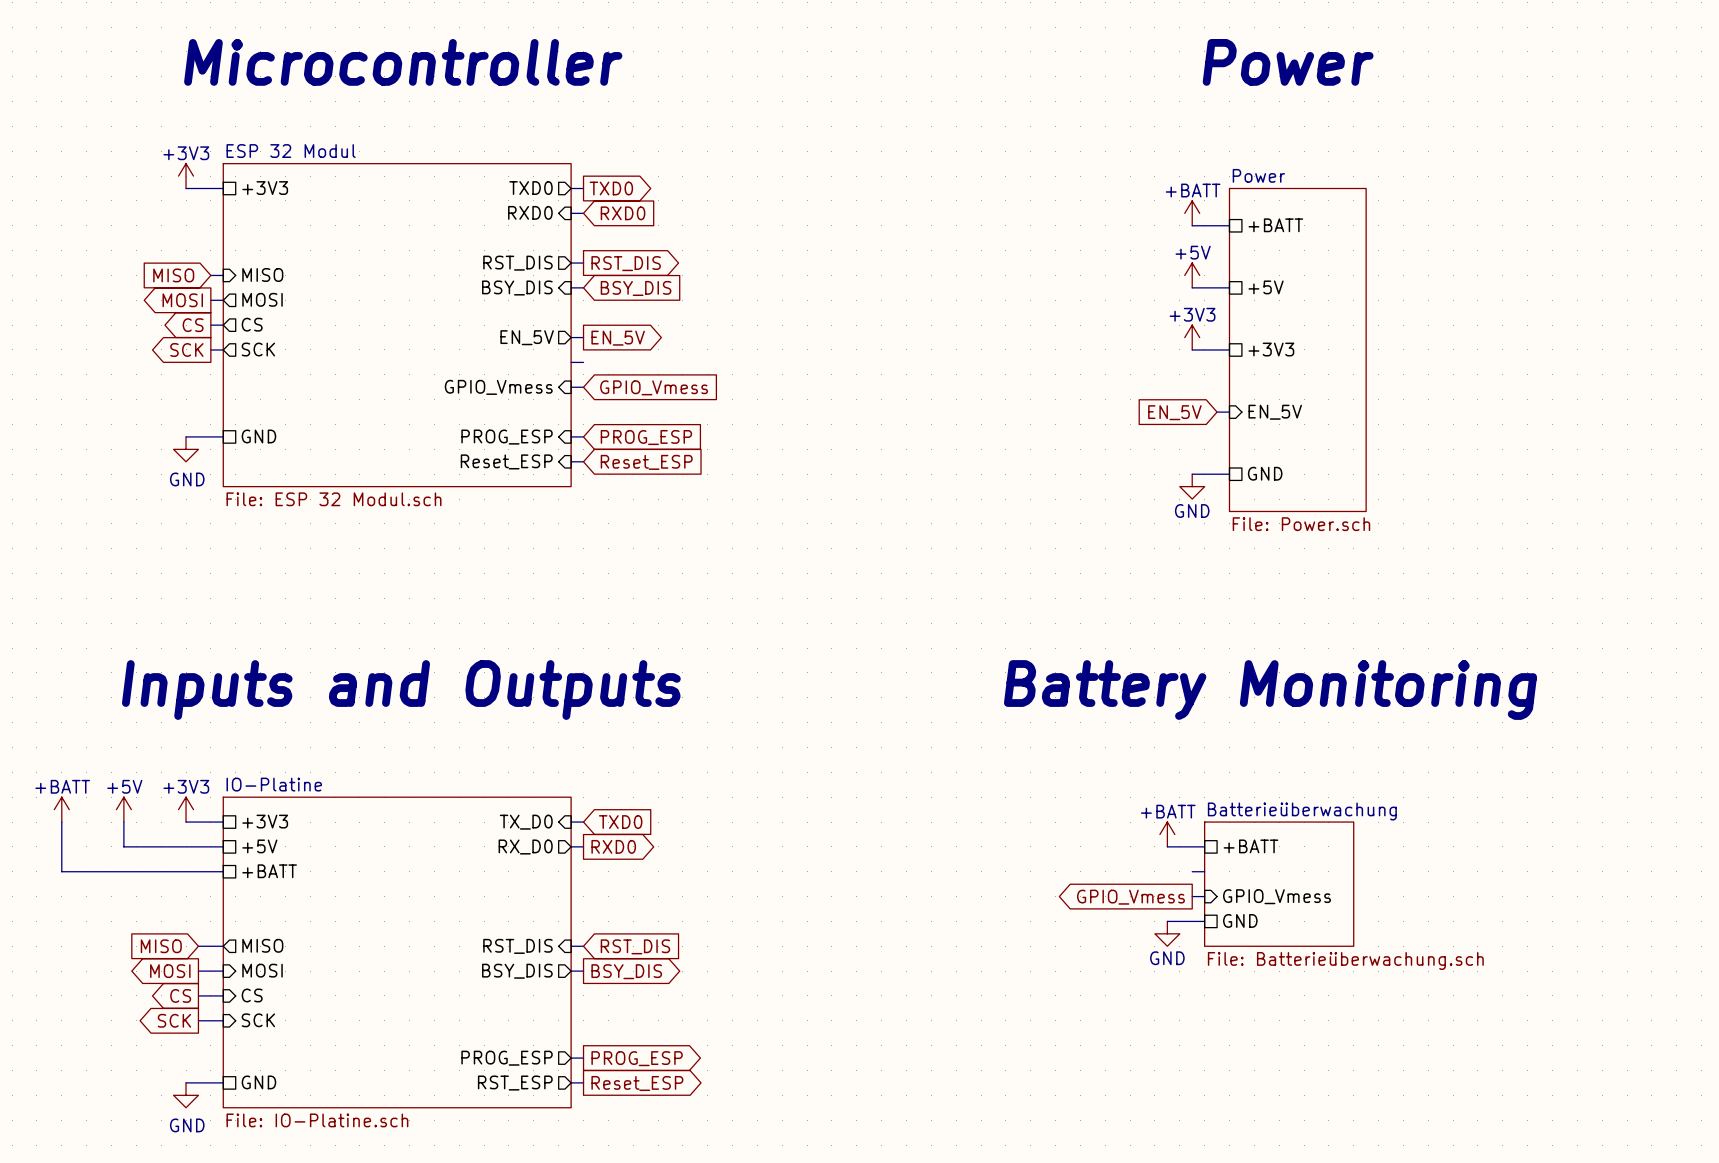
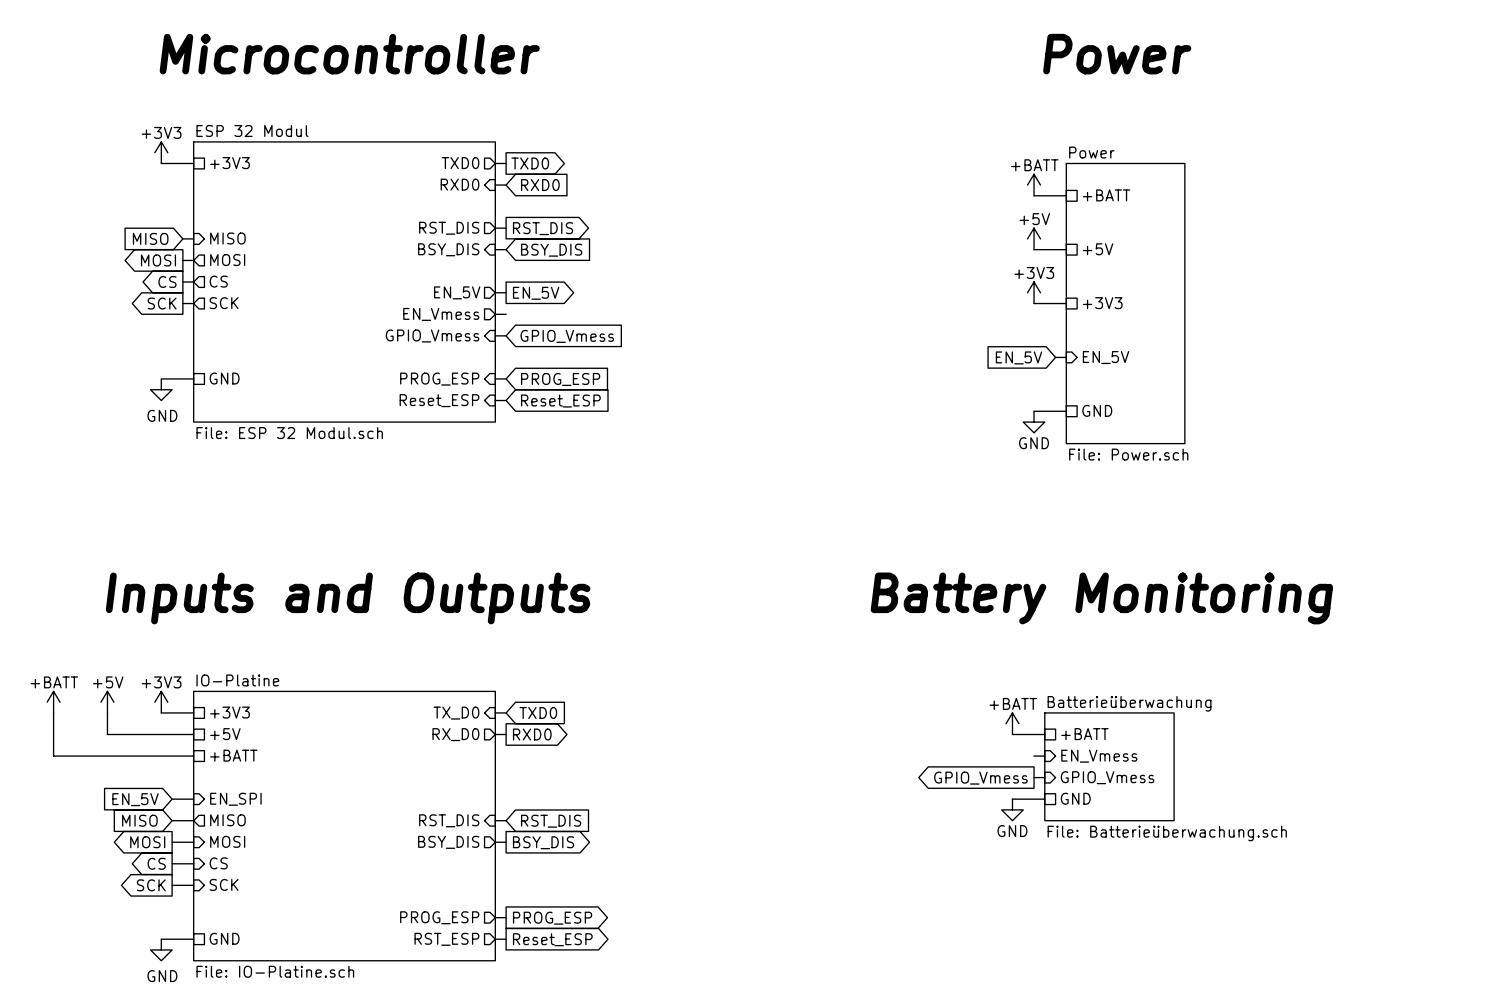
sheet pin: none -> EN_Vmess (441, 314)
sheet pin: none -> EN_Vmess (1099, 756)
wire: none -> (172, 799) (193, 799)
sheet pin: none -> EN_SPI (235, 799)
global label: none -> EN_5V (135, 799)

